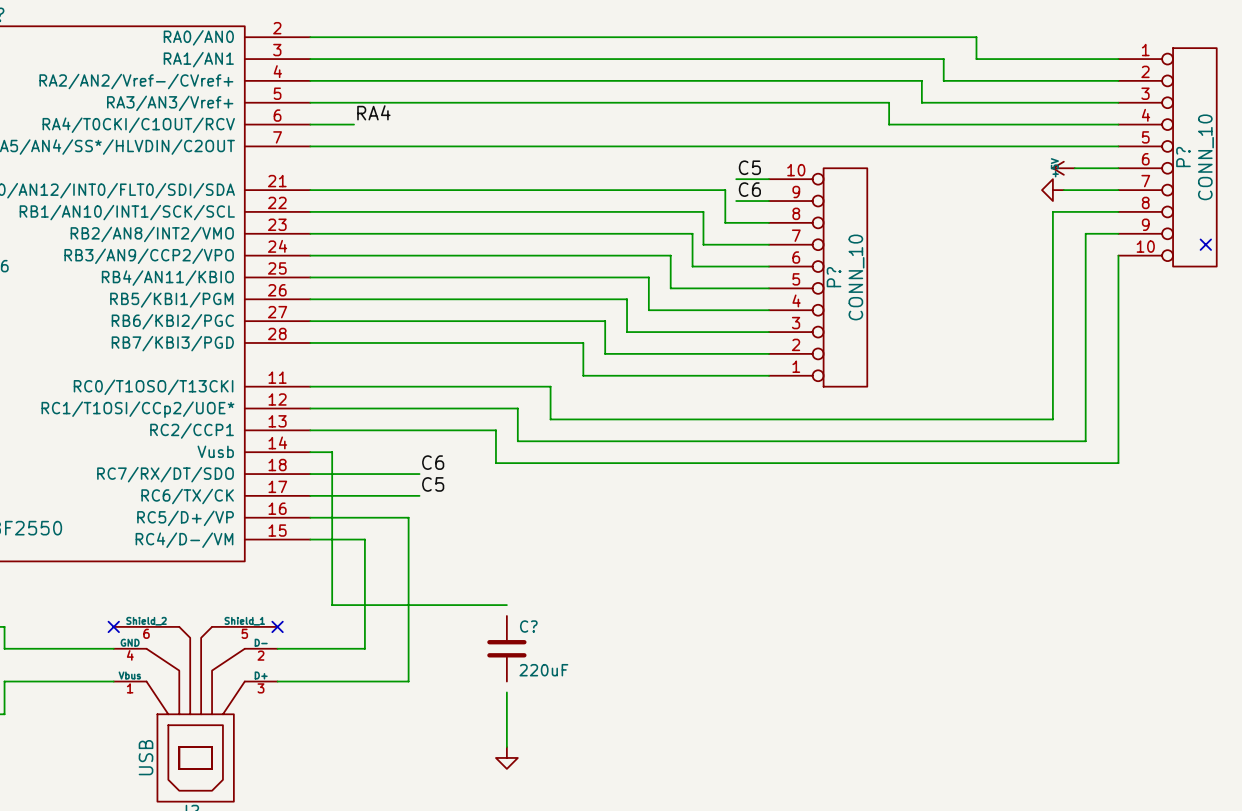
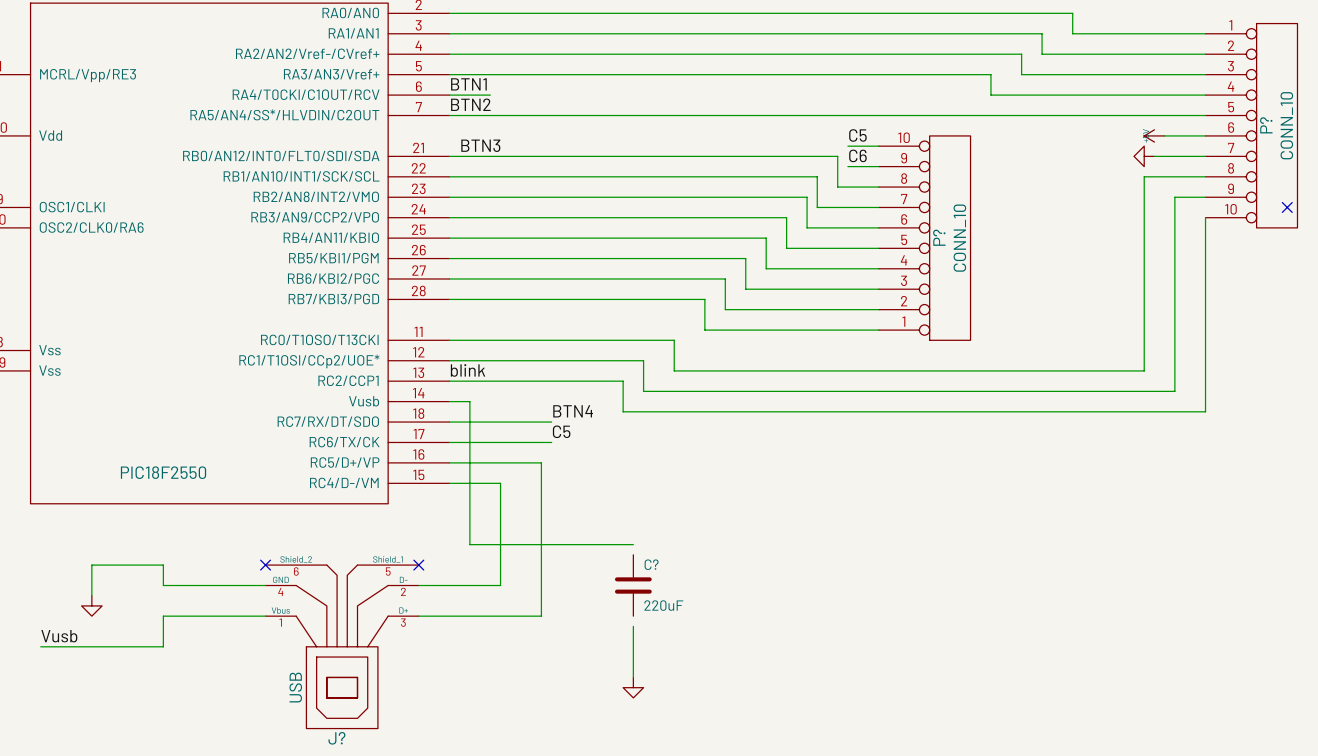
label: RA4 (373, 112) -> none
label: none -> BTN1 (468, 84)
label: none -> BTN2 (470, 104)
label: none -> BTN3 (480, 145)
label: none -> blink (468, 370)
label: C6 (433, 462) -> BTN4 (573, 411)

